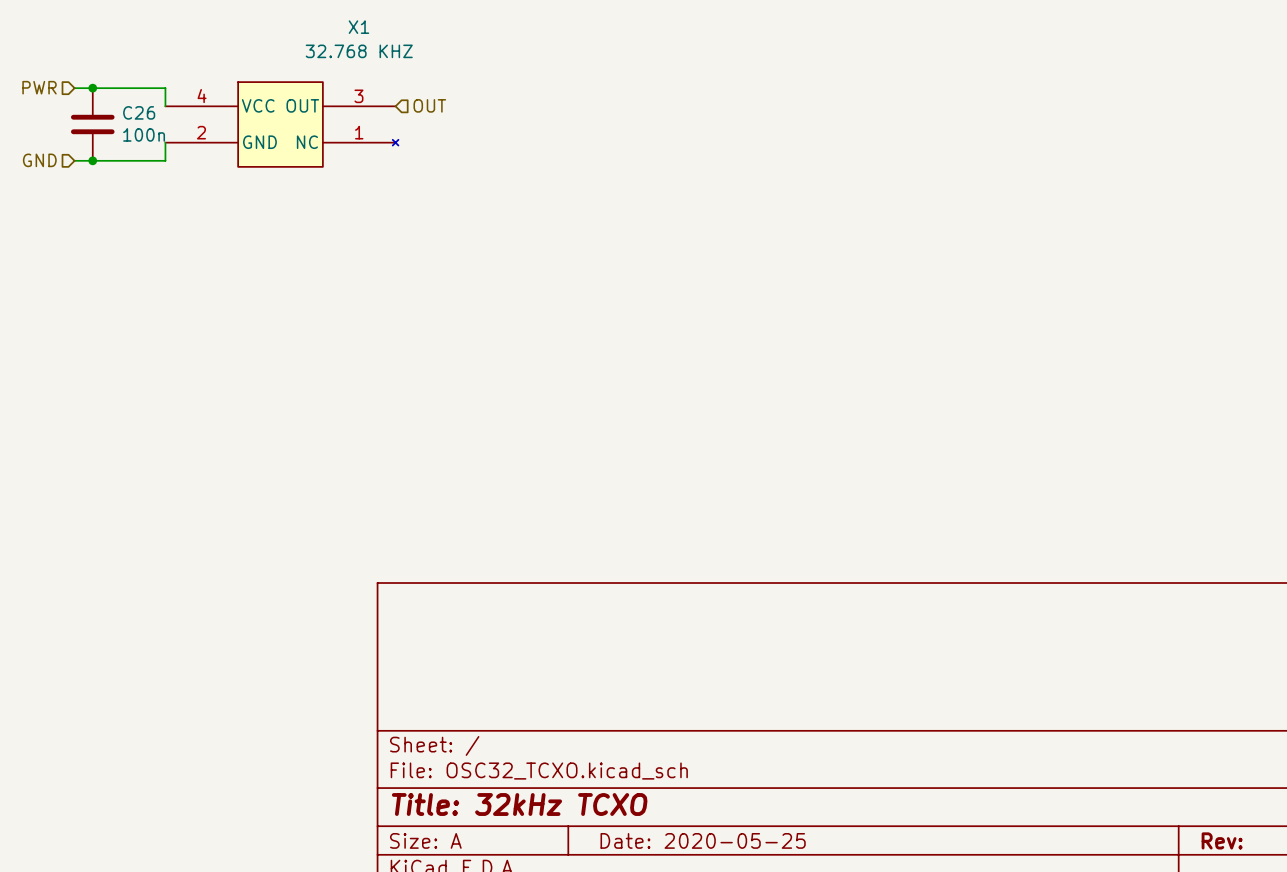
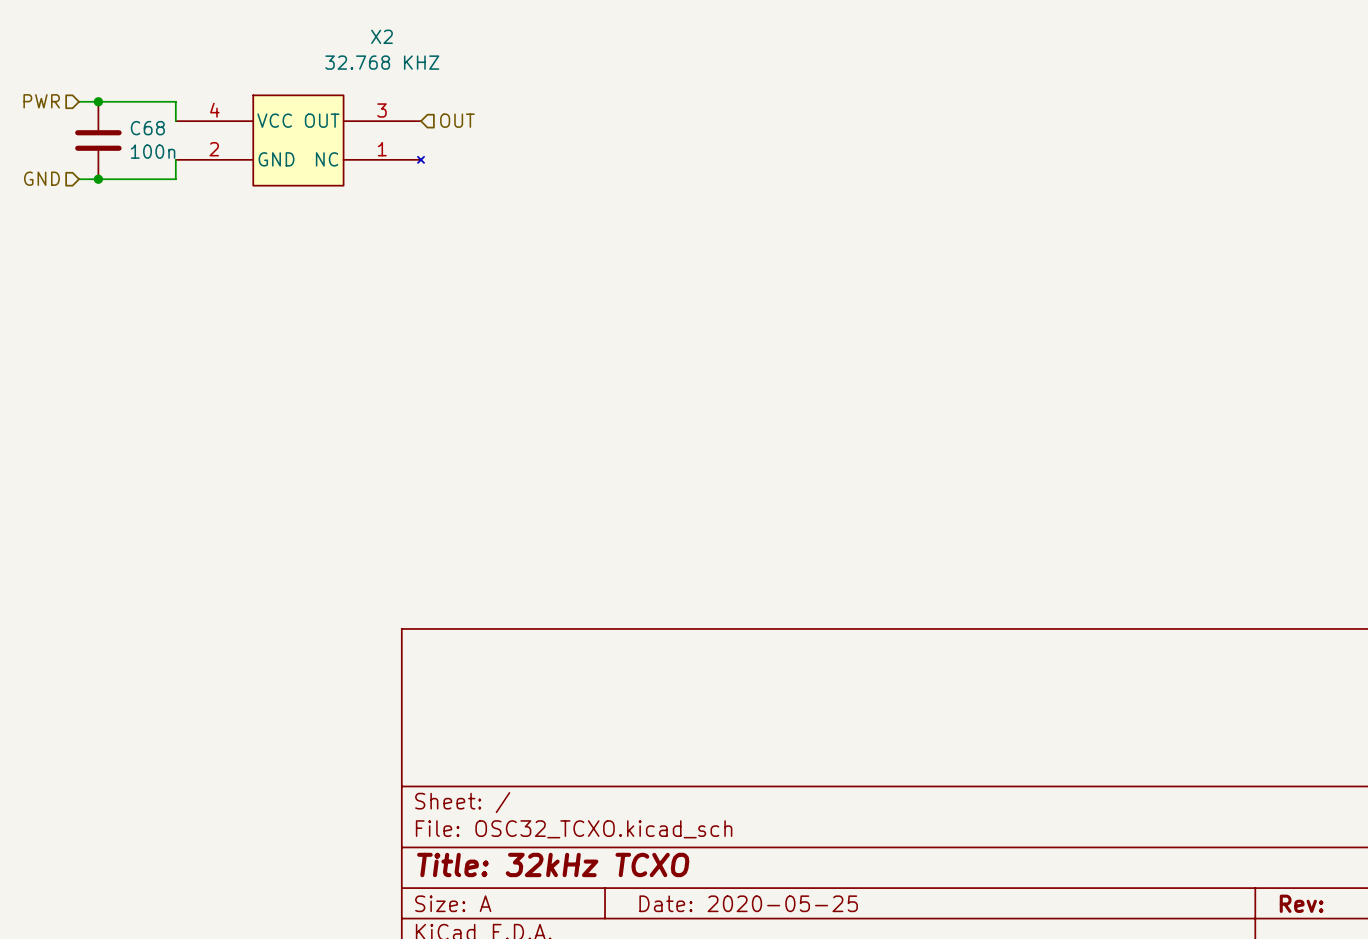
X1 name: X1 (358, 27) -> X2 (381, 36)
C26 name: C26 (139, 112) -> C68 (147, 128)

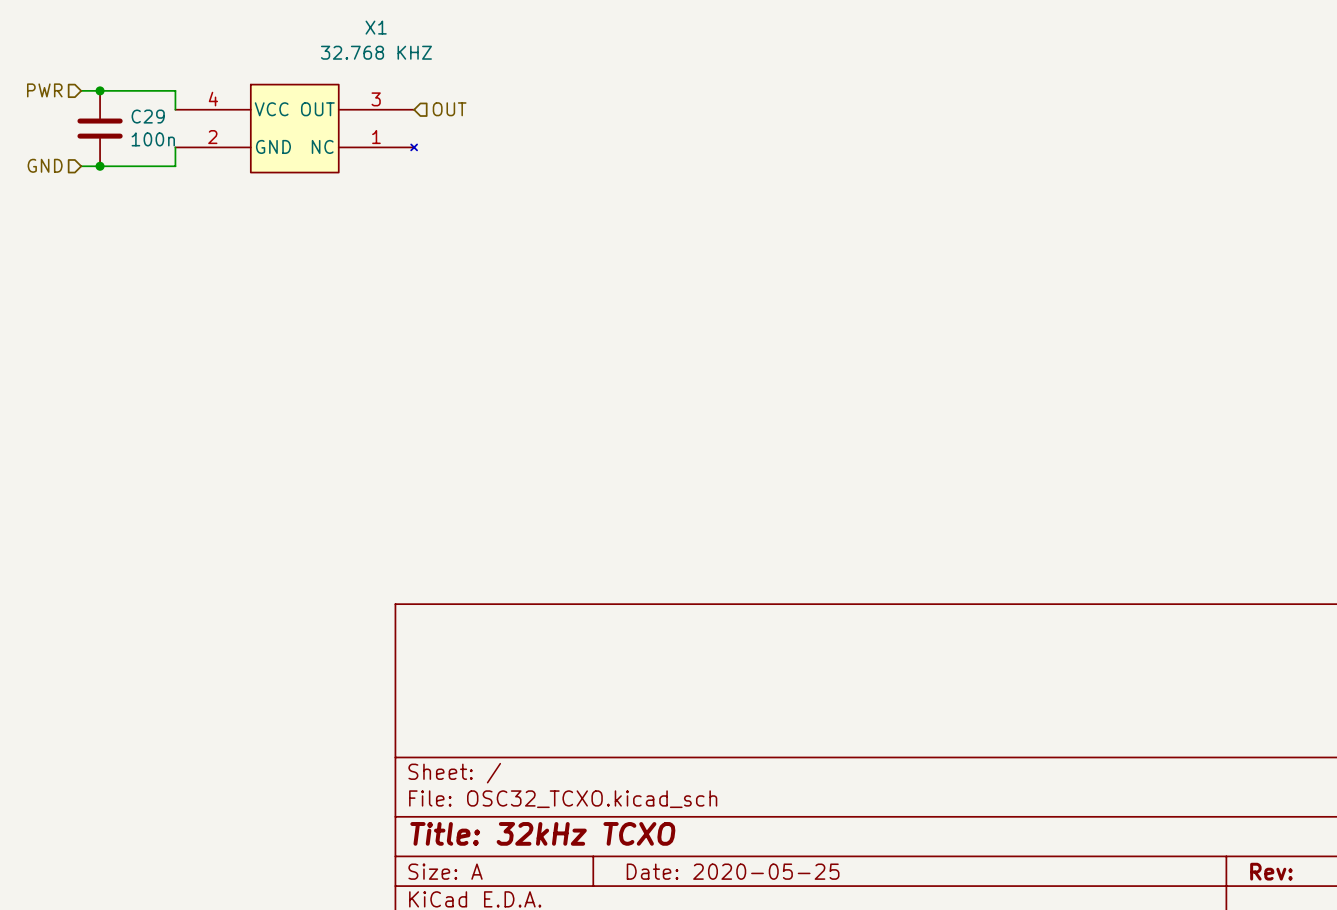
X2 name: X2 (381, 36) -> X1 (376, 27)
C68 name: C68 (147, 128) -> C29 (148, 116)

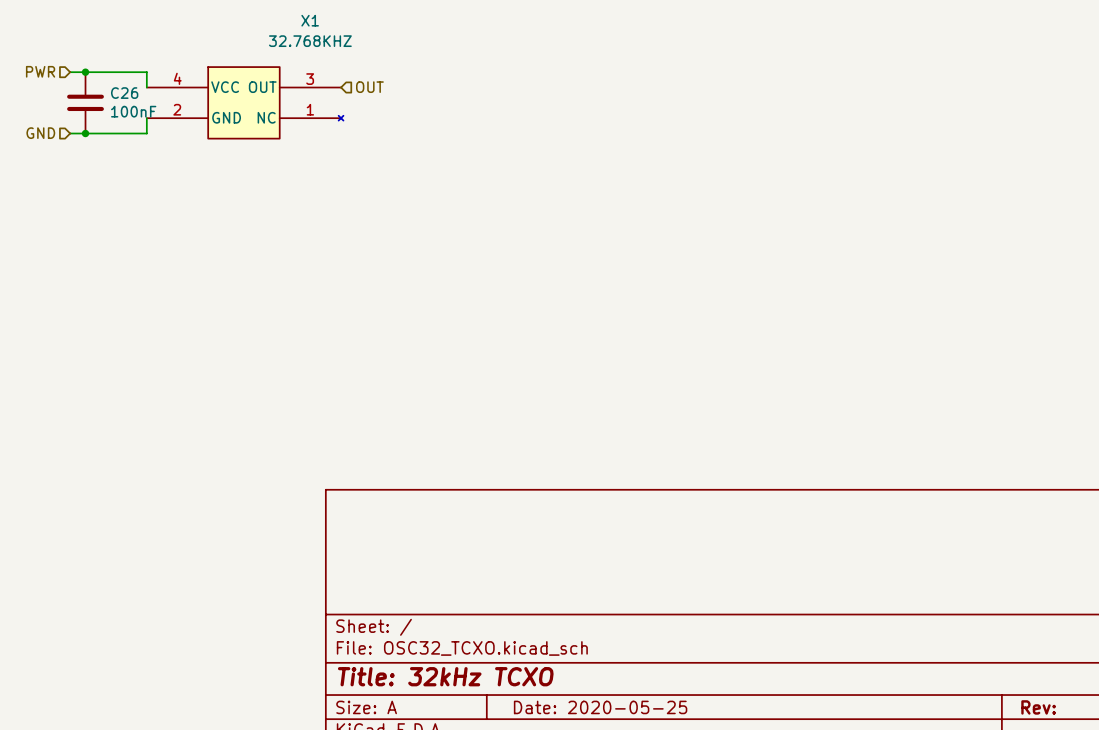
X1 value: 32.768 KHZ (376, 52) -> 32.768KHZ (310, 41)
C29 name: C29 (148, 116) -> C26 (124, 93)
C29 value: 100n (153, 139) -> 100nF (133, 111)

